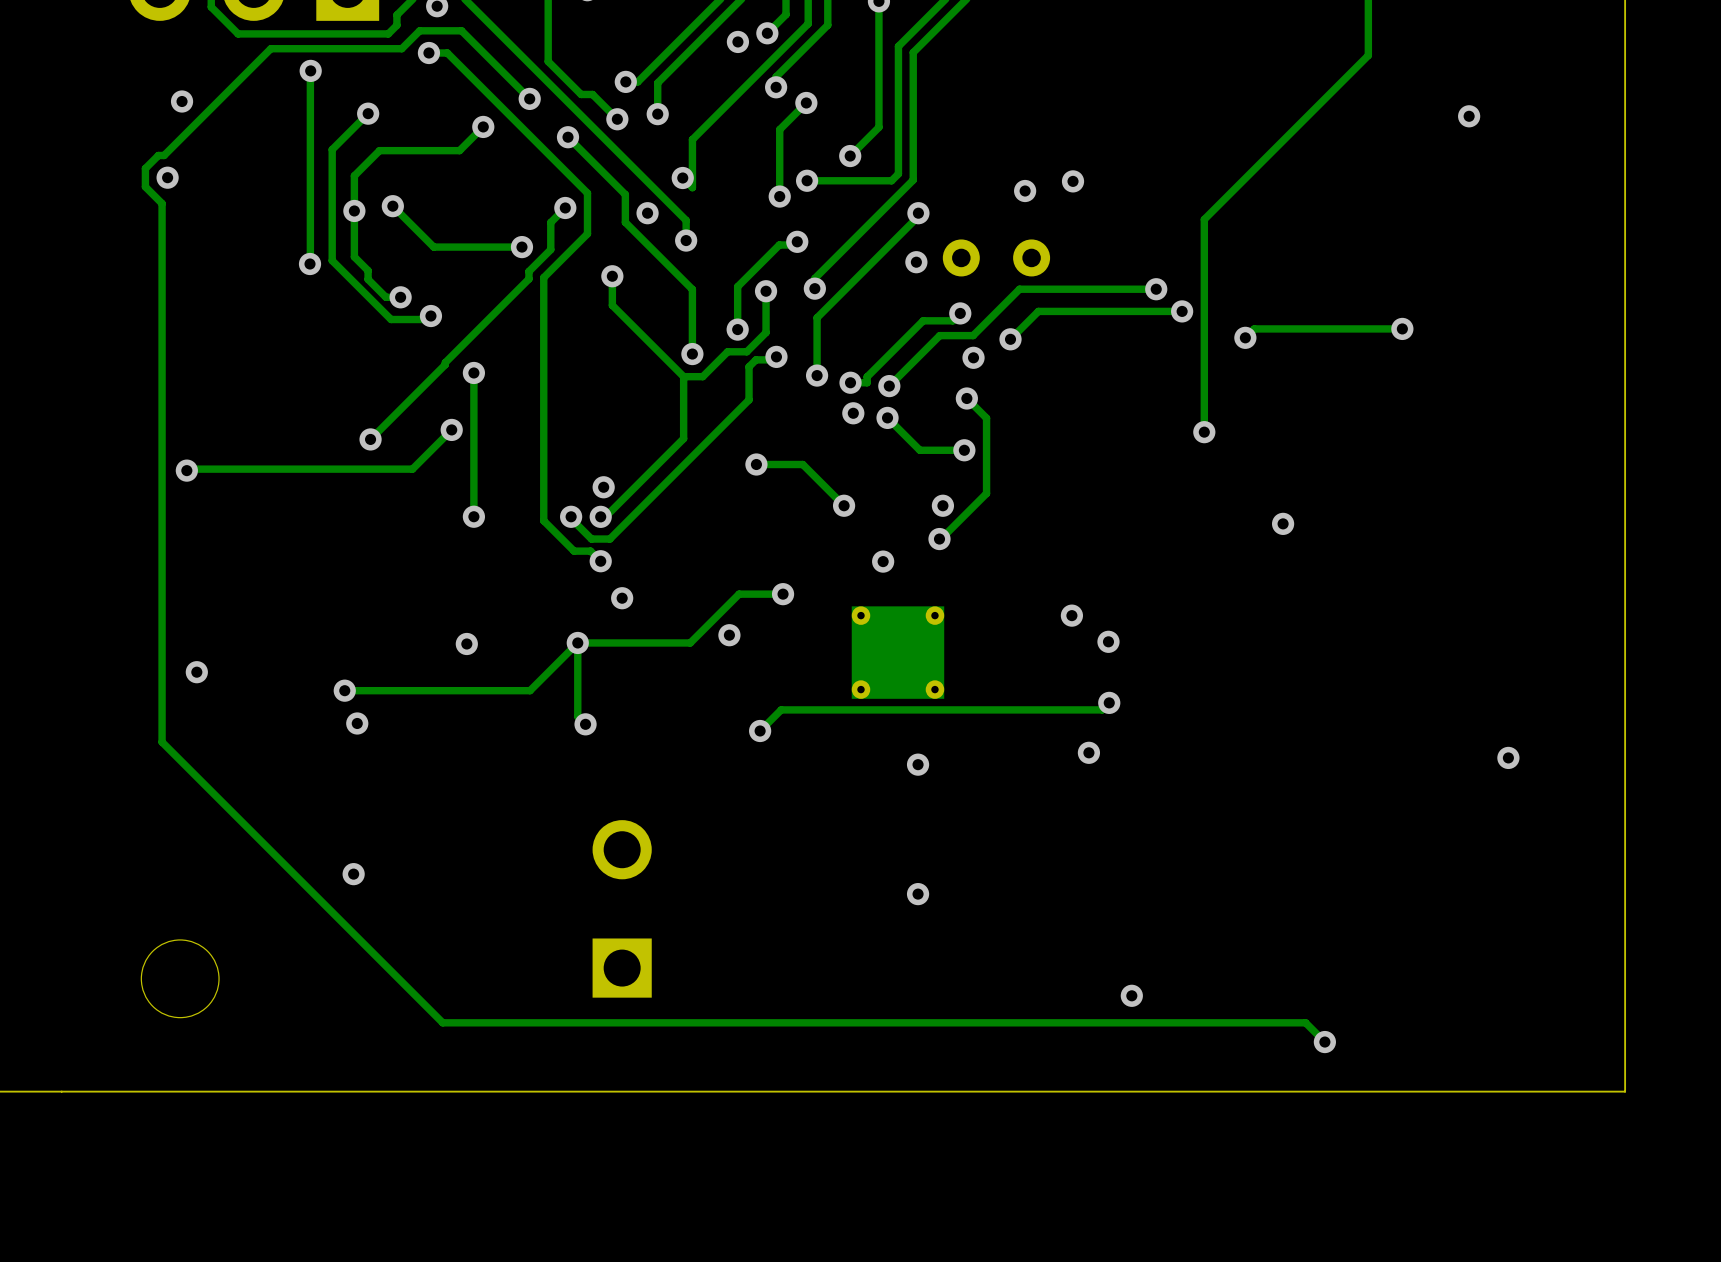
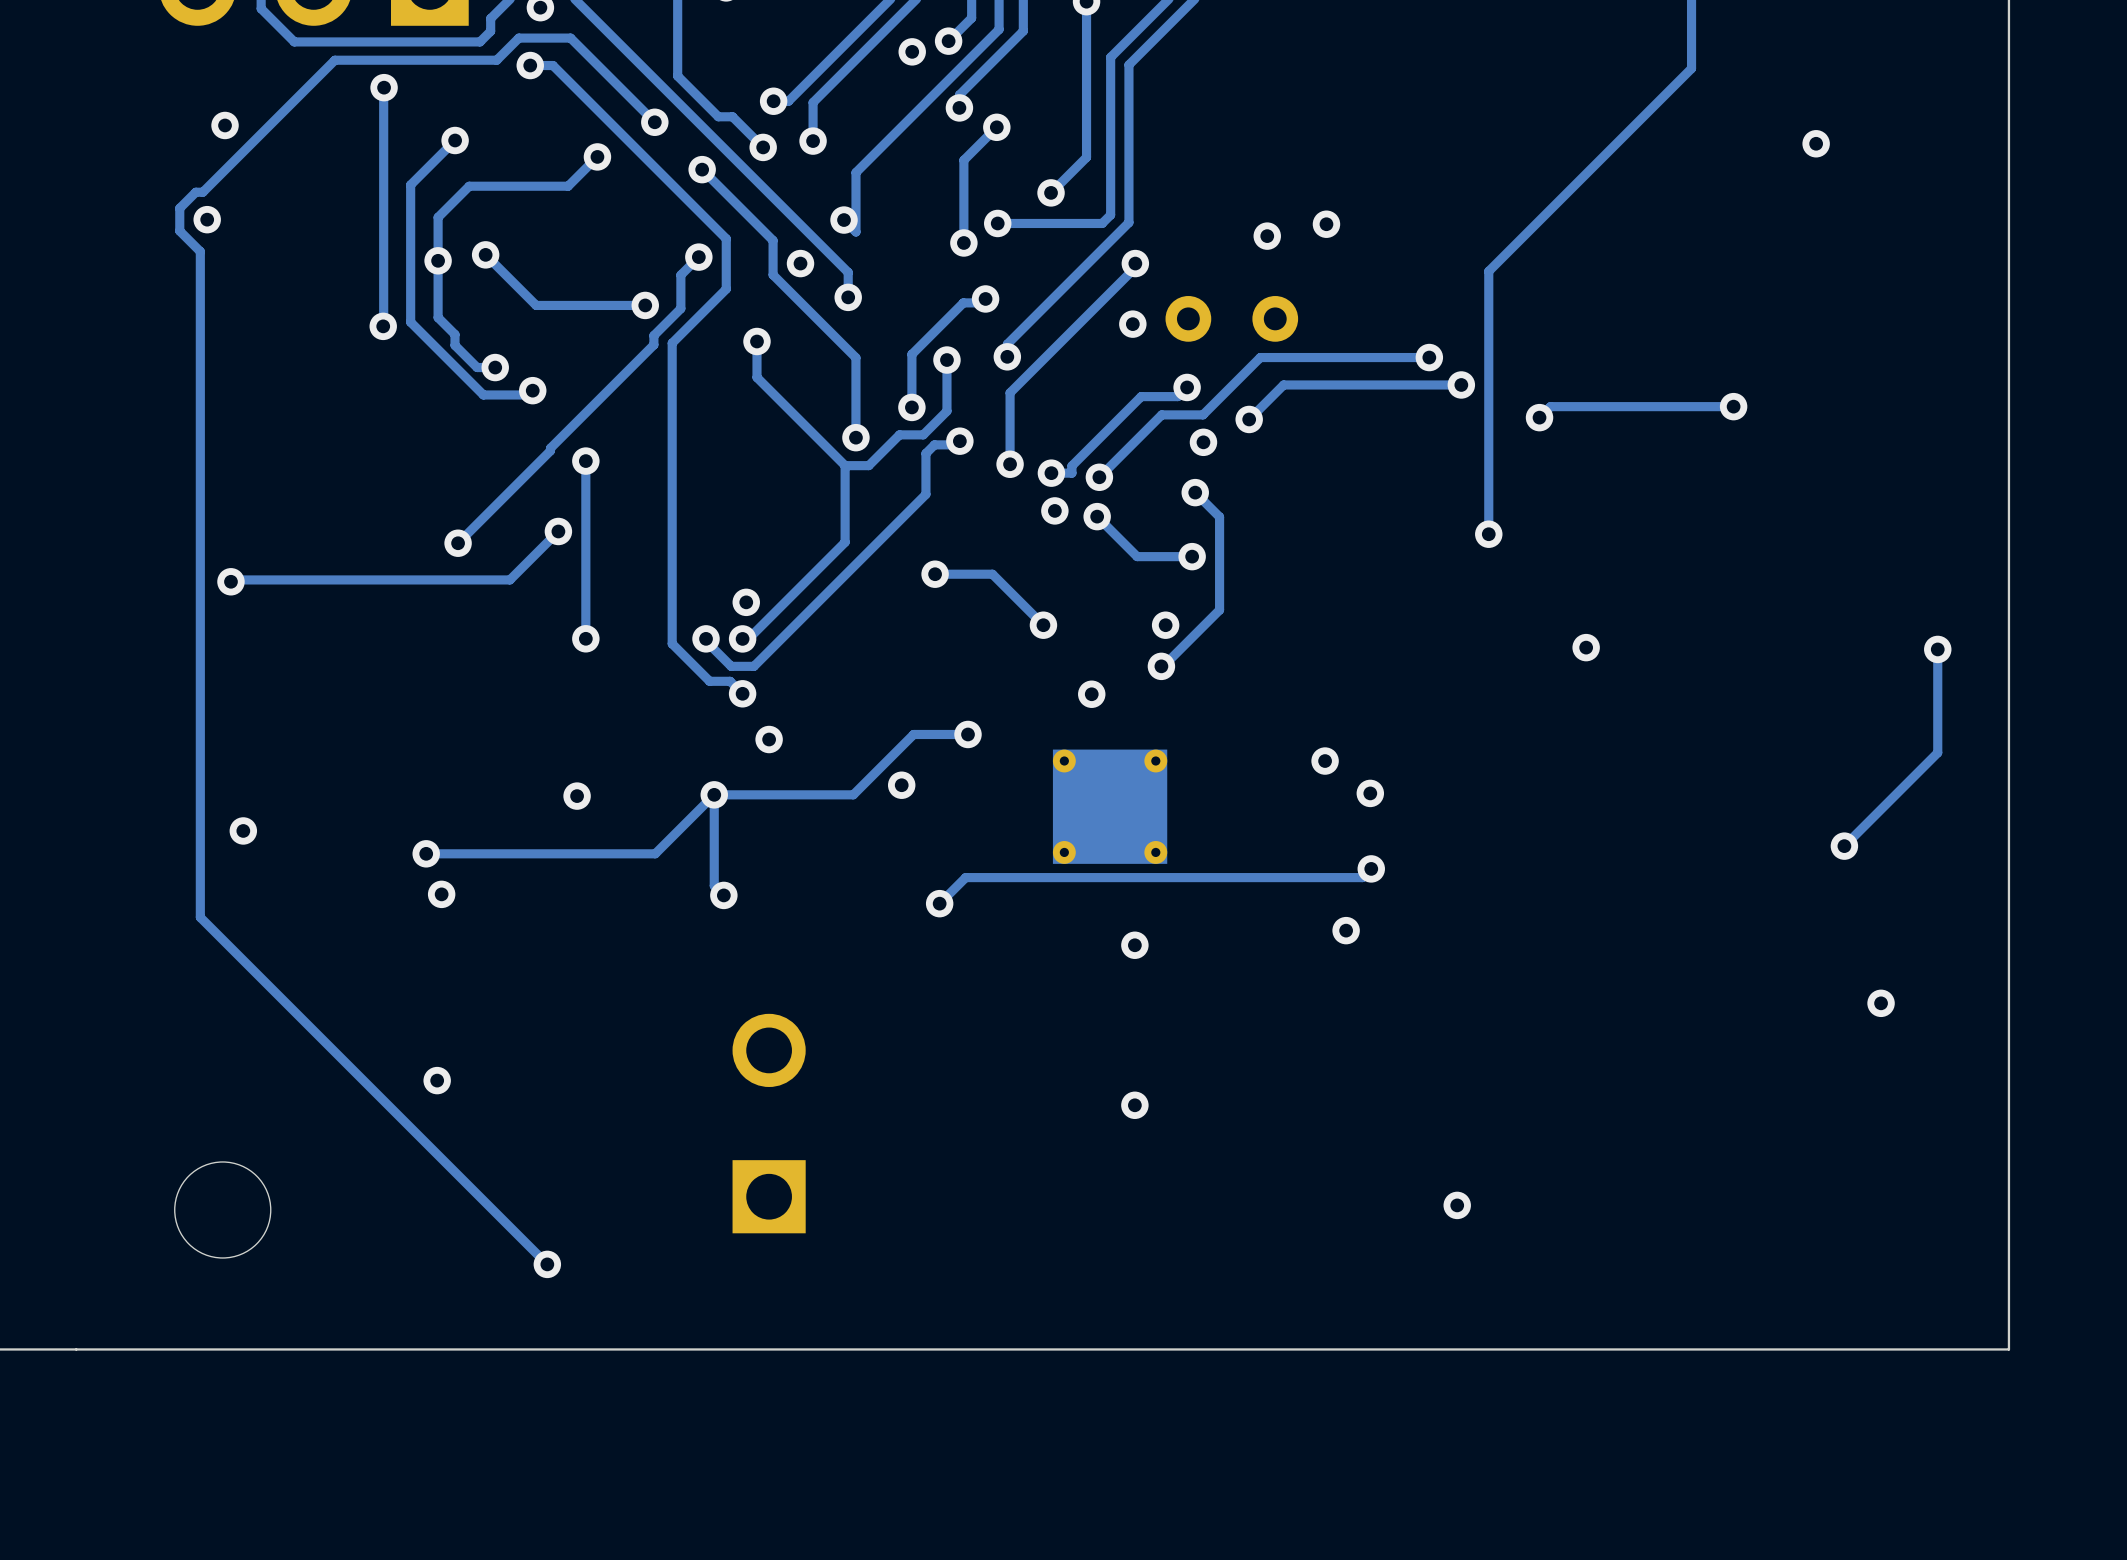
track: none -> (1937, 649) (1937, 752) (1844, 846)
via: none -> (1937, 649)
via: none -> (1844, 846)
via: (1508, 757) -> none
via: none -> (1881, 1003)
via position: (1131, 995) -> (1457, 1205)
track: (442, 1022) (1305, 1022) (1324, 1042) -> none
via: none -> (547, 1264)
via: (1324, 1042) -> none

